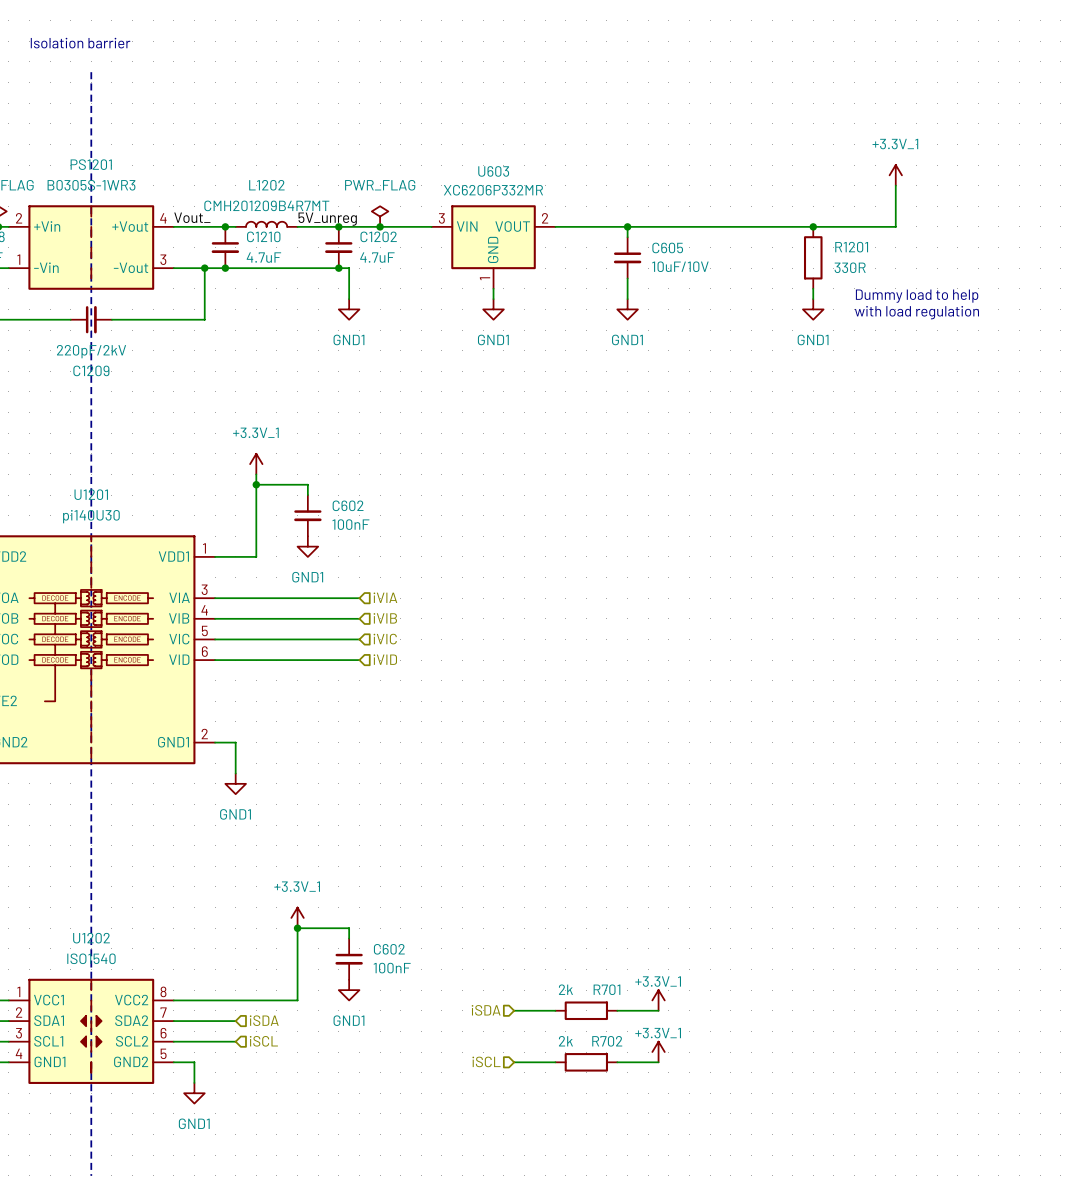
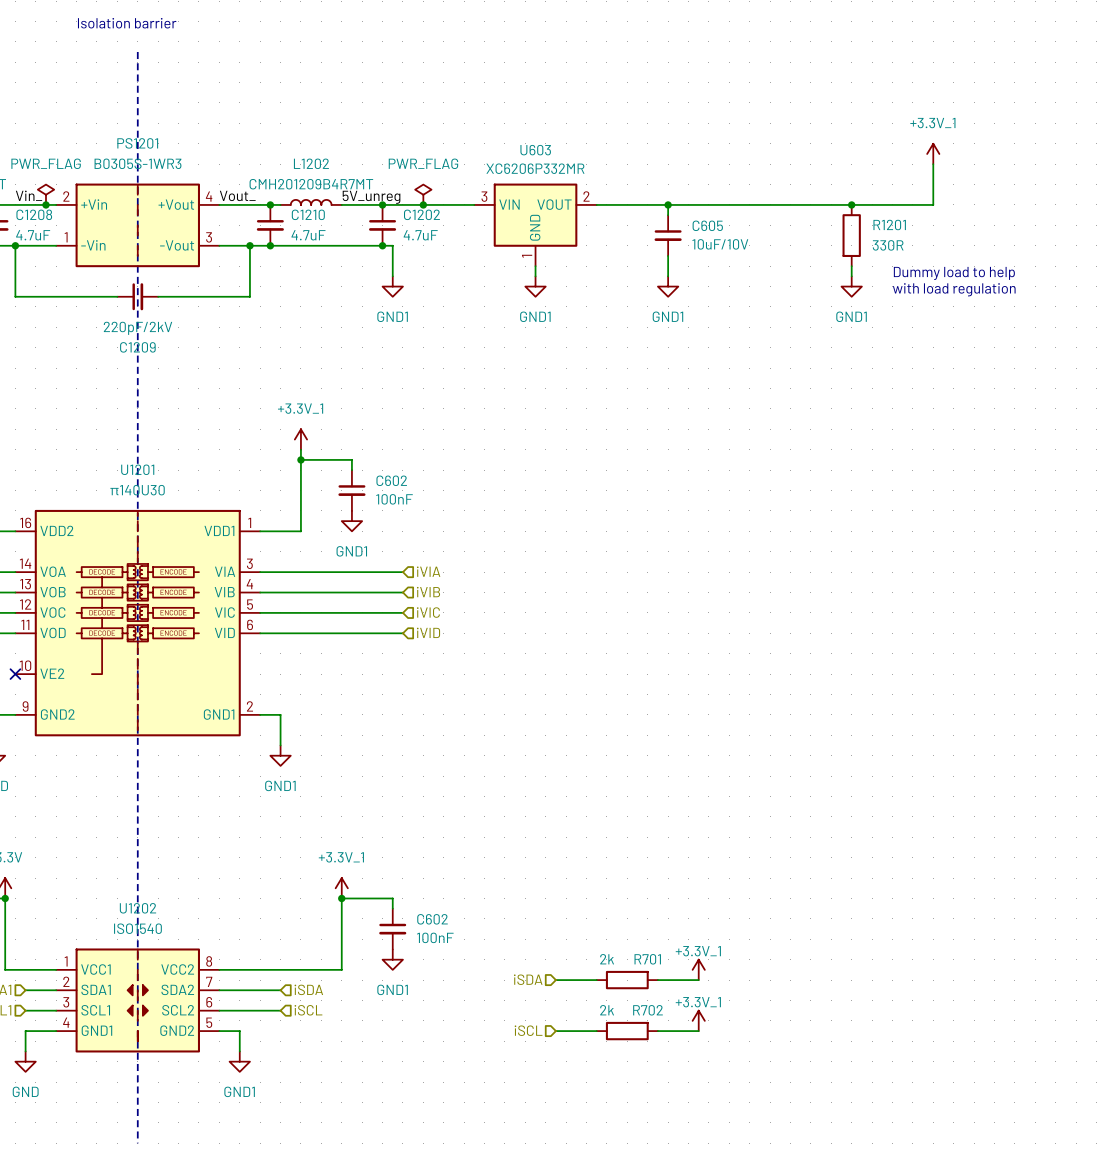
U1201 value: pi140U30 (91, 516) -> π140U30 (137, 490)

